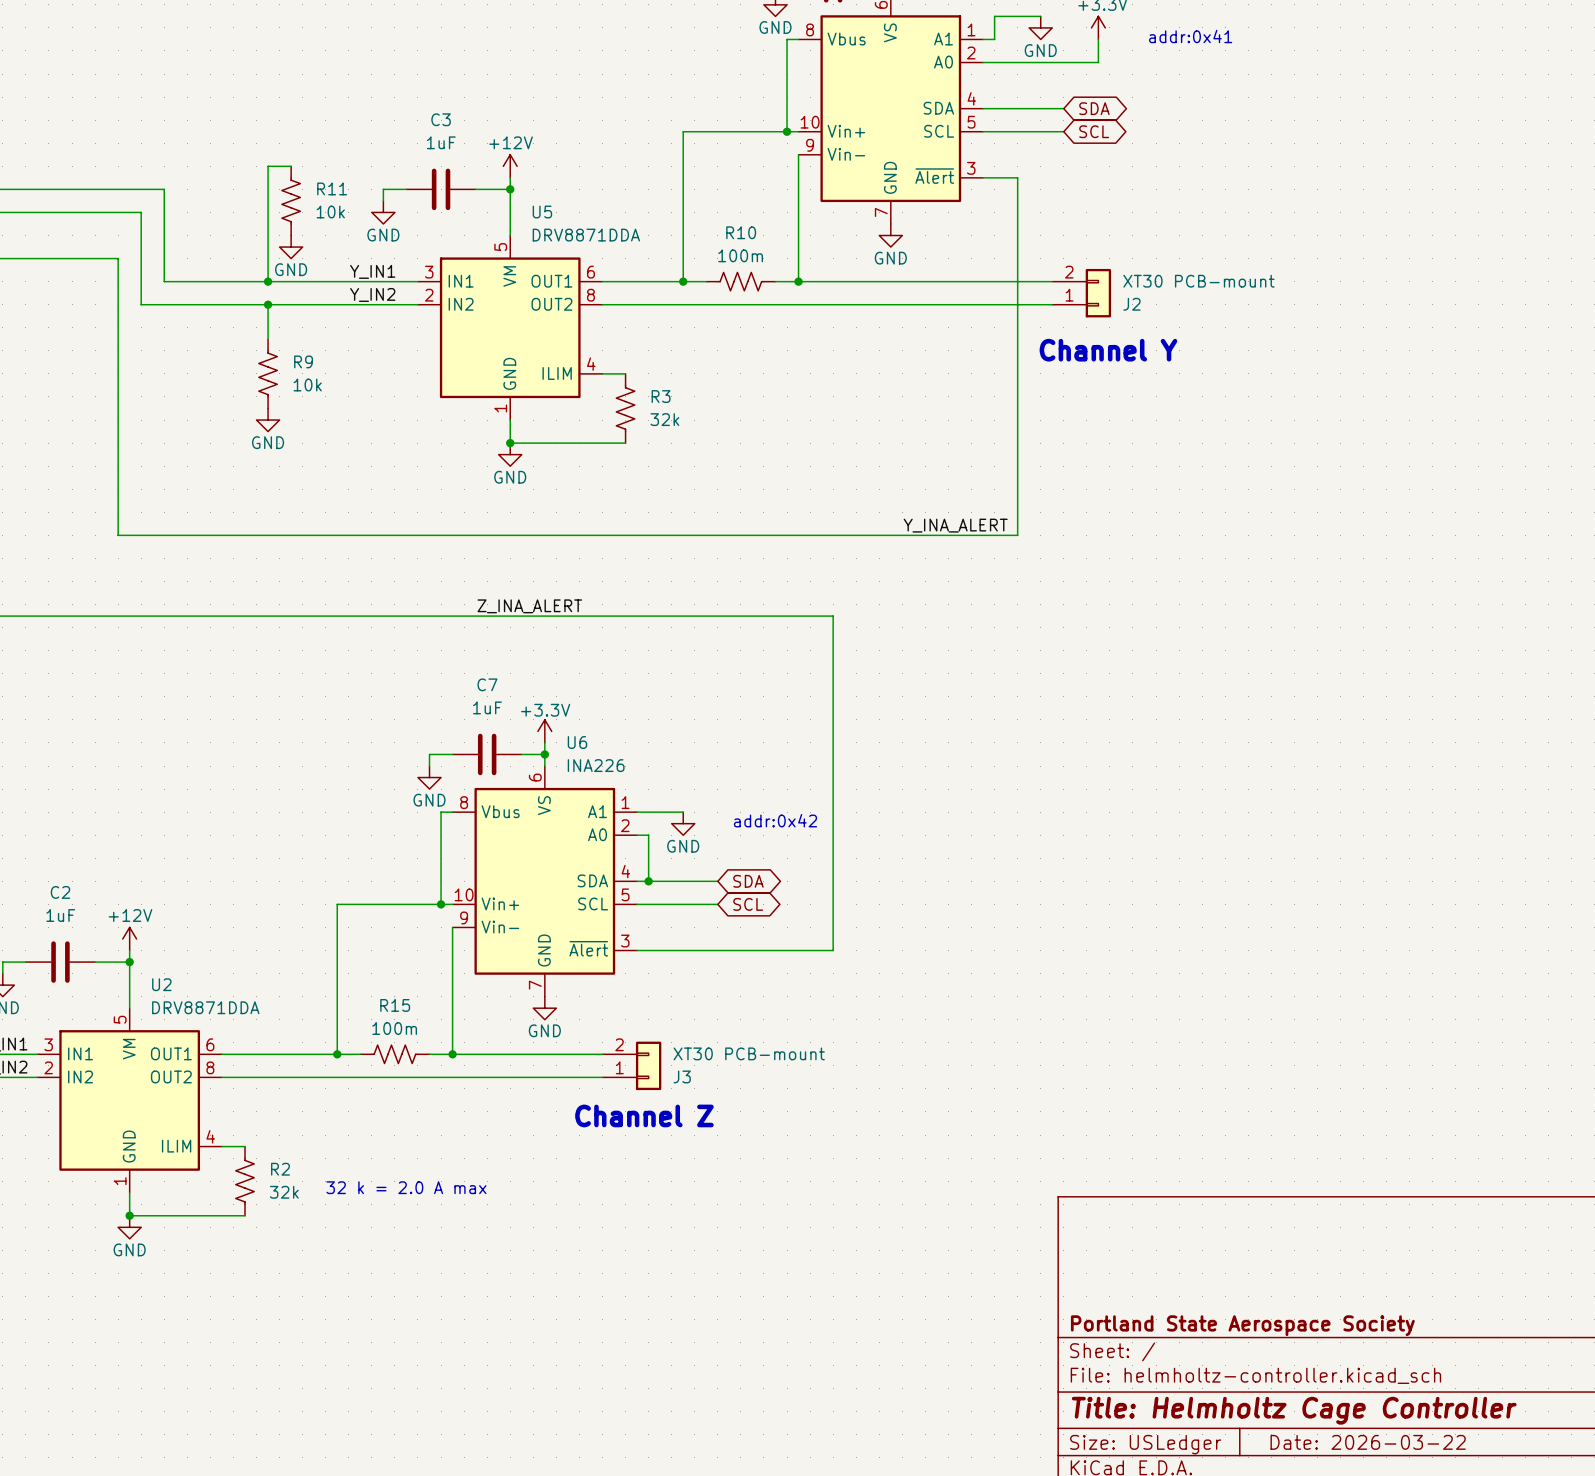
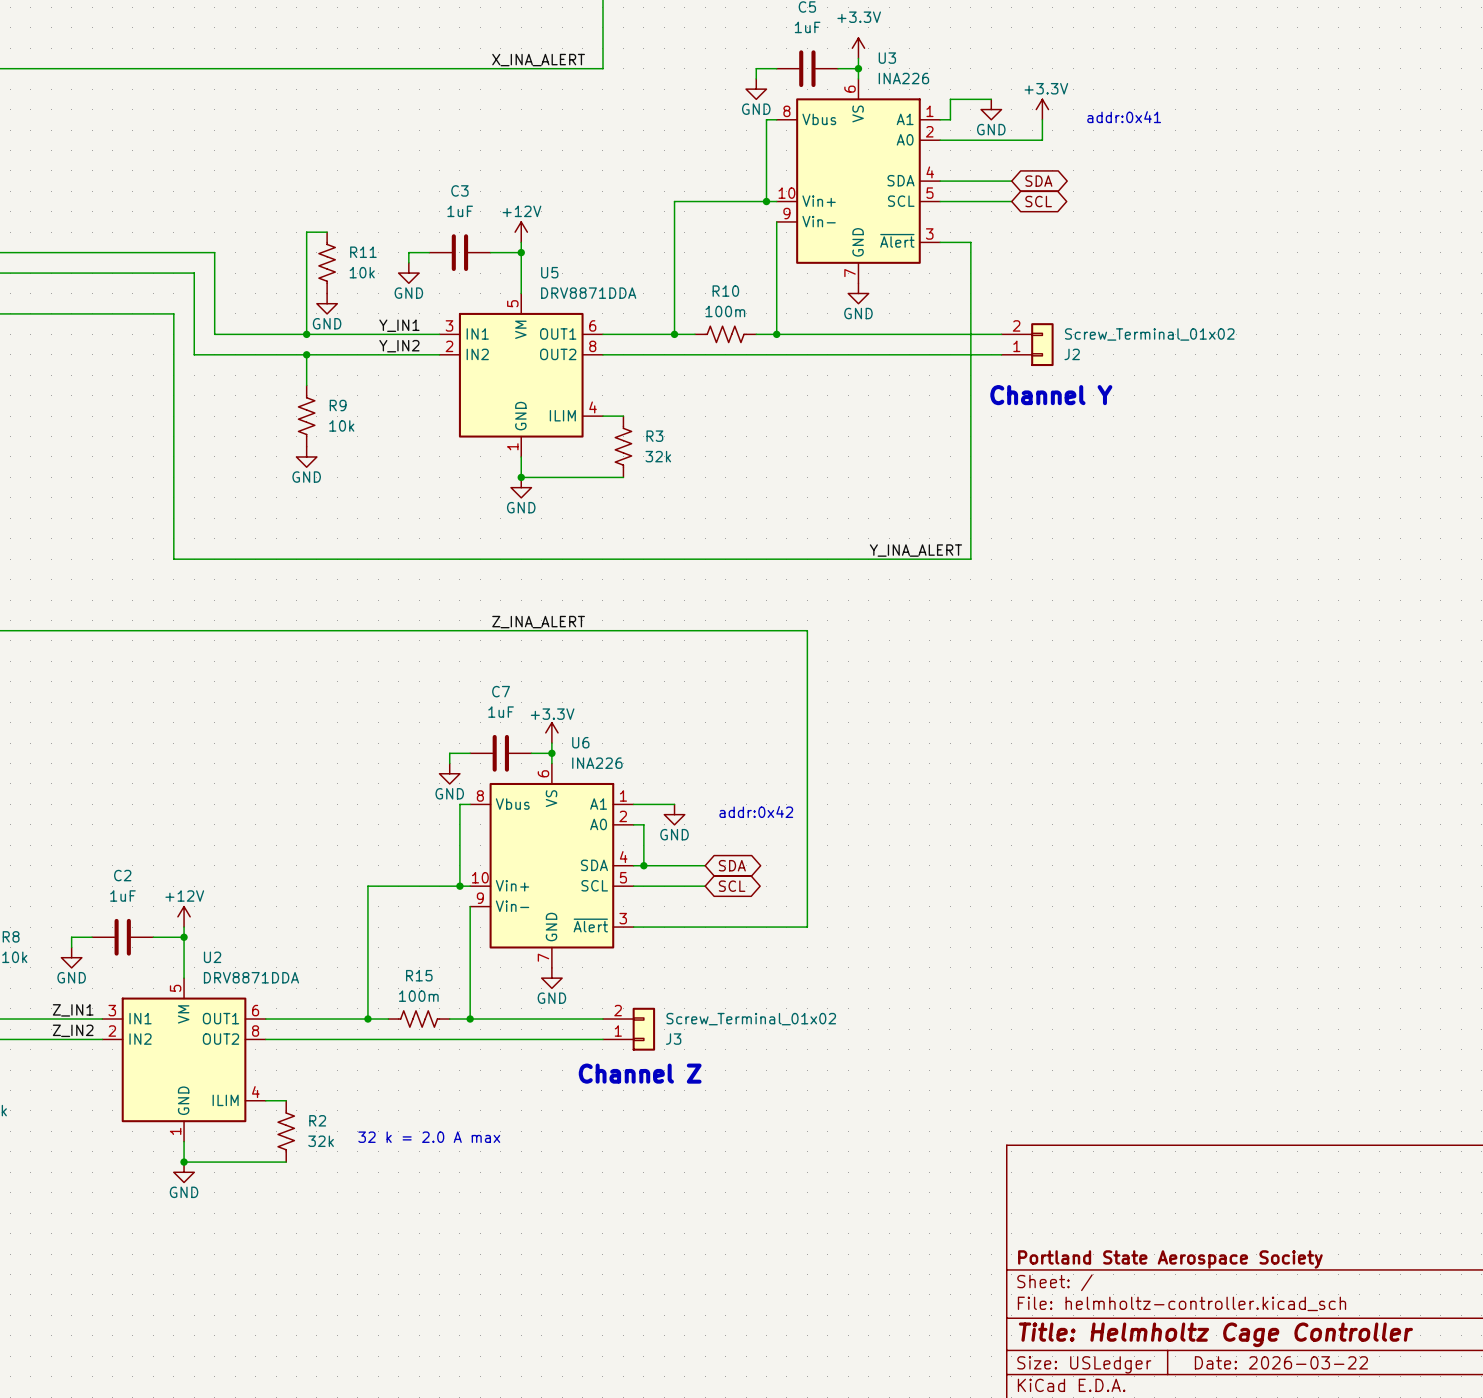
J2 value: XT30 PCB-mount (1198, 281) -> Screw_Terminal_01x02 (1149, 334)
J3 value: XT30 PCB-mount (749, 1053) -> Screw_Terminal_01x02 (751, 1019)

